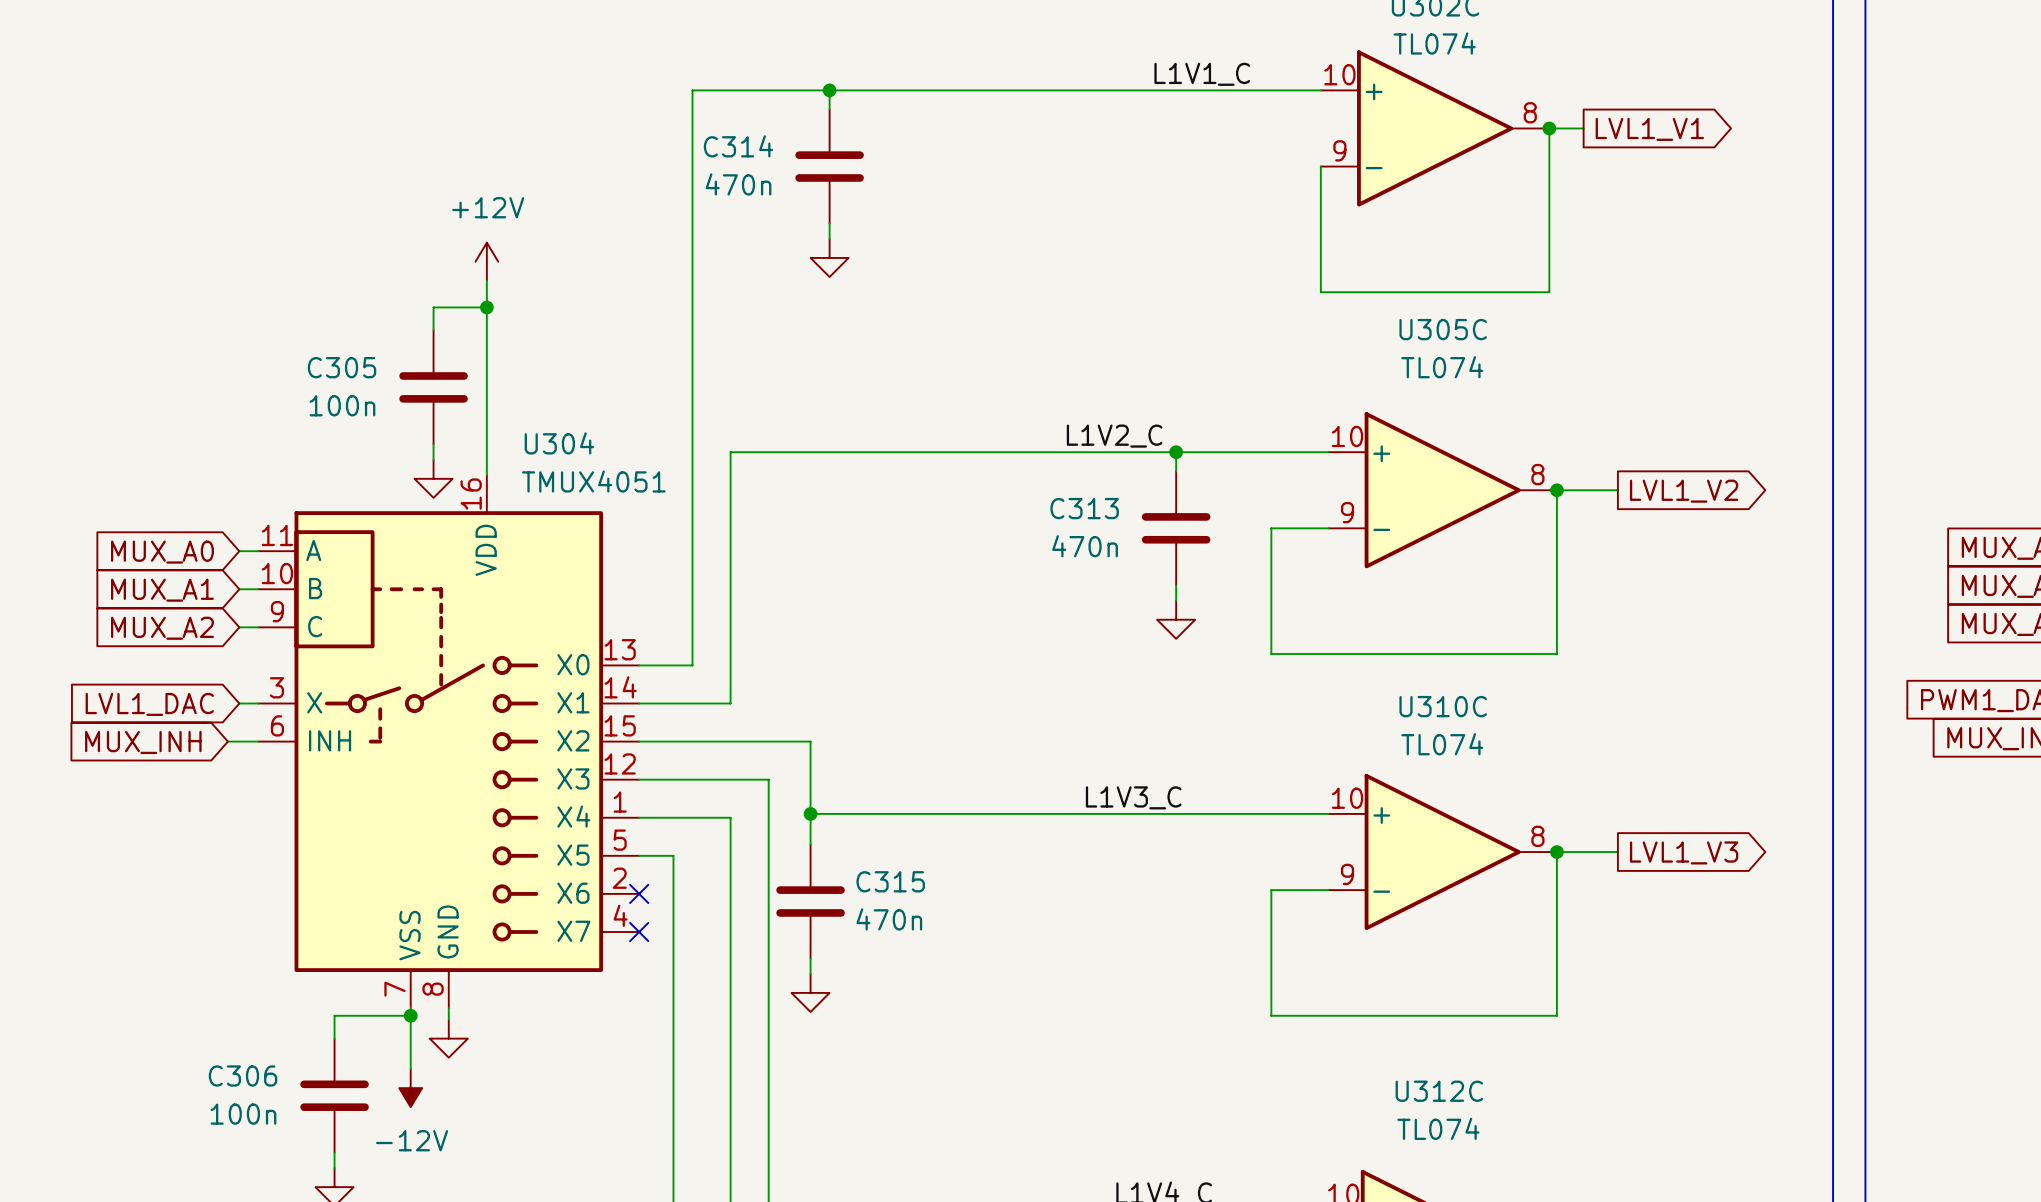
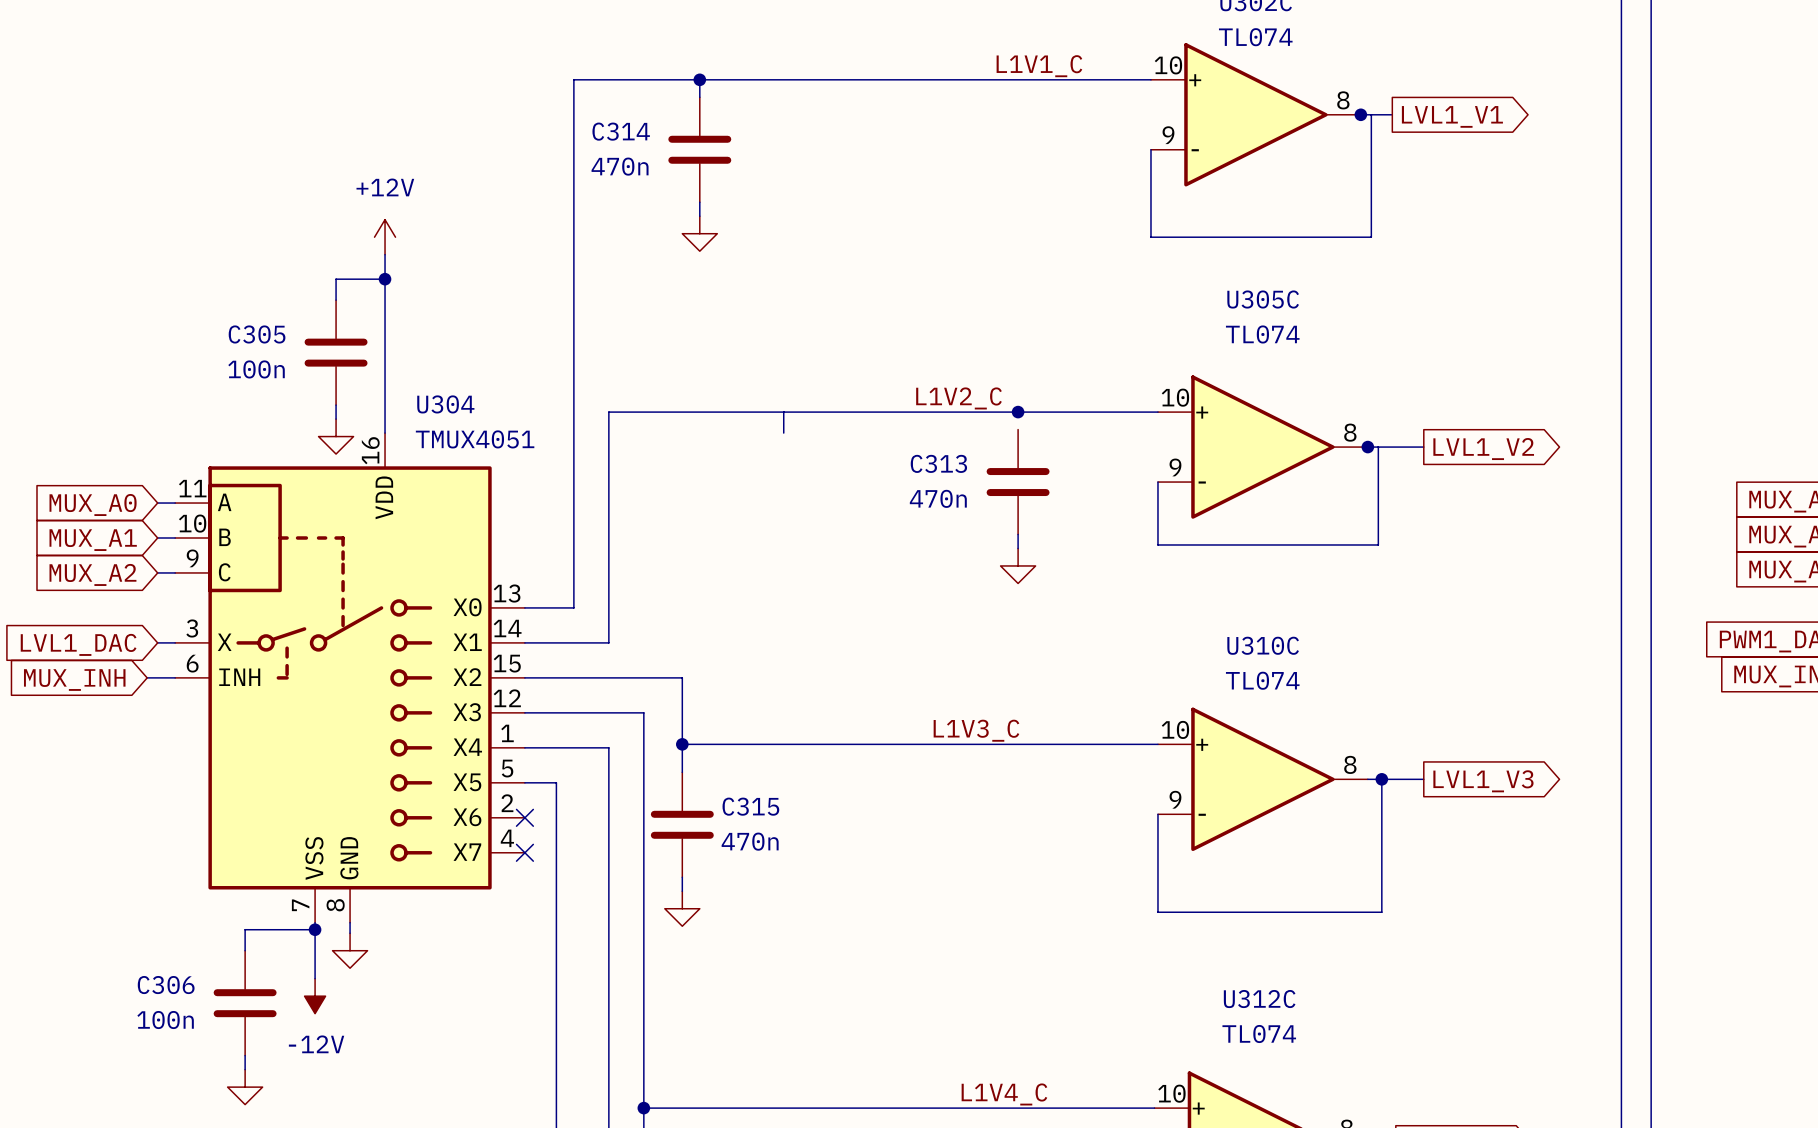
wire: (1549, 128) (1549, 292) (1320, 292) (1320, 261) -> (1371, 114) (1371, 237) (1150, 237)
wire: none -> (783, 412) (783, 433)
wire: (1176, 452) (1176, 471) -> none
wire: (1556, 490) (1556, 654) (1271, 654) (1271, 528) (1328, 528) -> (1378, 447) (1378, 544) (1157, 544) (1157, 482)
wire: (1556, 852) (1556, 1015) (1271, 1015) (1271, 890) (1328, 890) -> (1381, 779) (1381, 912) (1157, 912) (1157, 814)
junction position: (1556, 852) -> (1381, 779)

